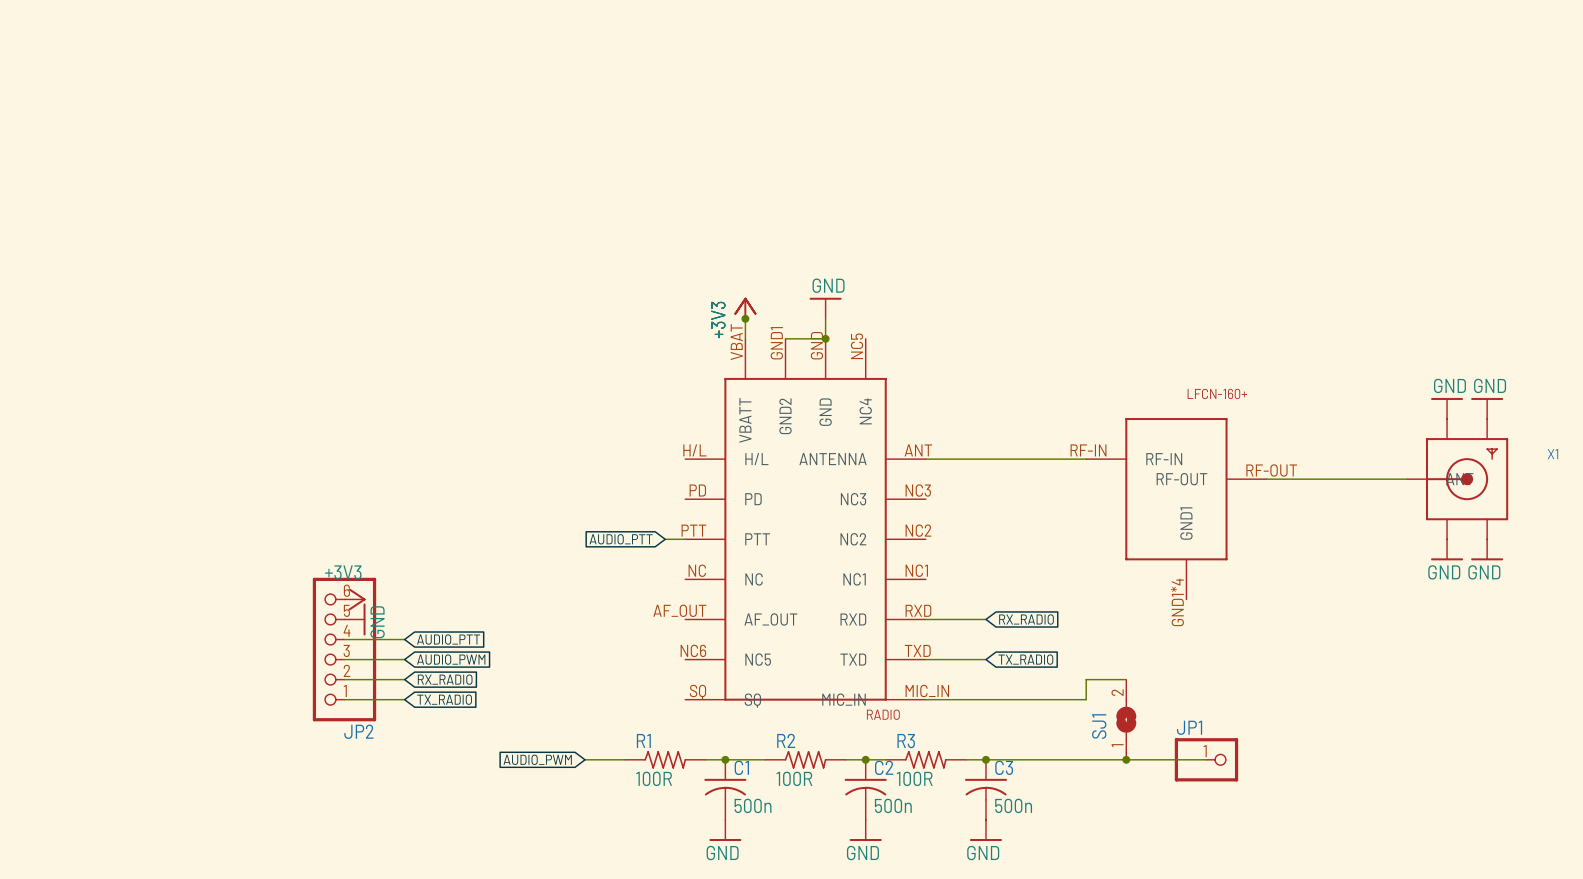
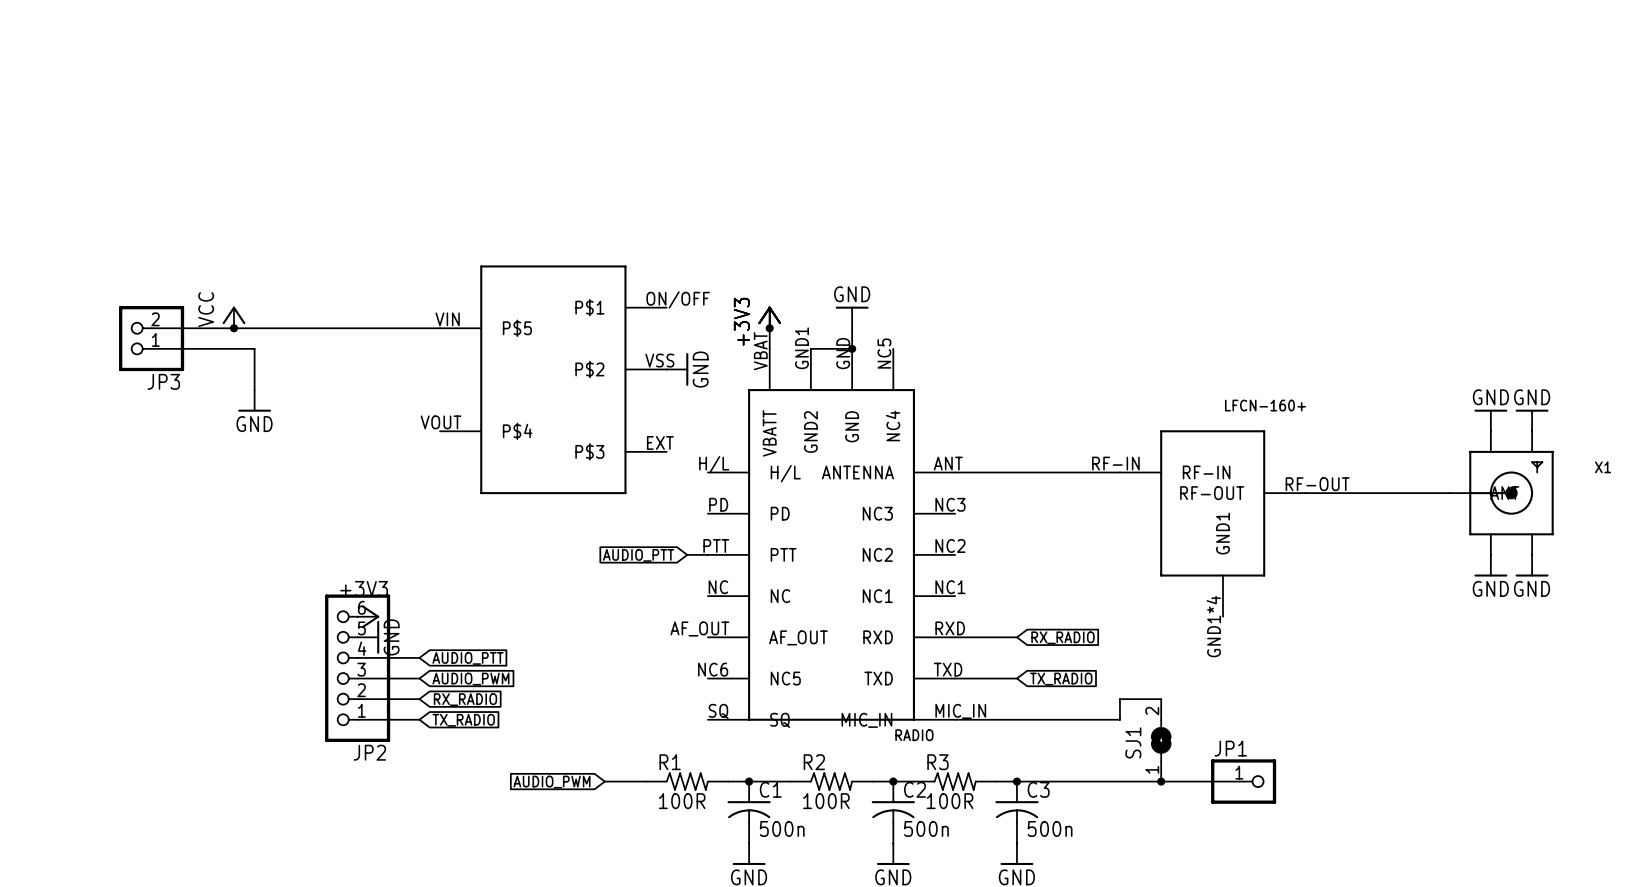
power symbol: none -> VCC (233, 317)
wire: none -> (151, 328) (440, 328)
junction: none -> (233, 328)
JP3: none -> (151, 338)
wire: none -> (151, 348) (254, 348) (254, 390)
power symbol: none -> GND (677, 369)
part: none -> (553, 379)
power symbol: none -> GND (254, 400)

